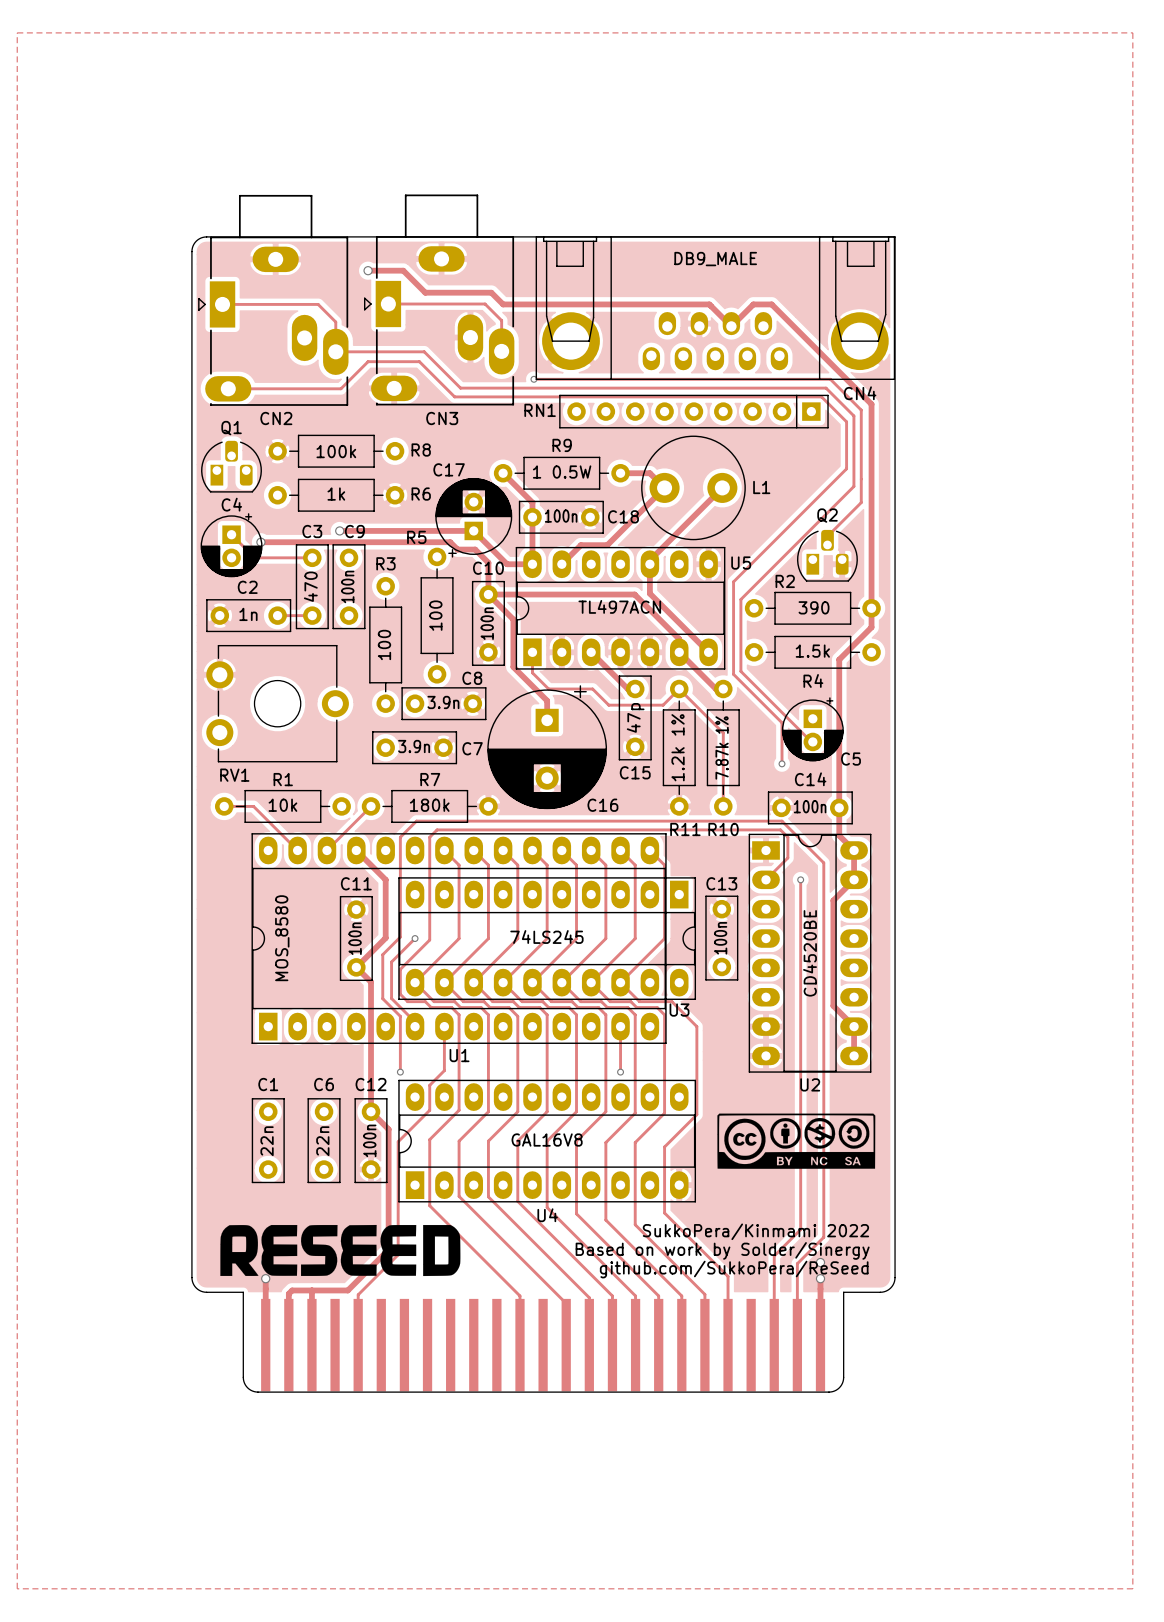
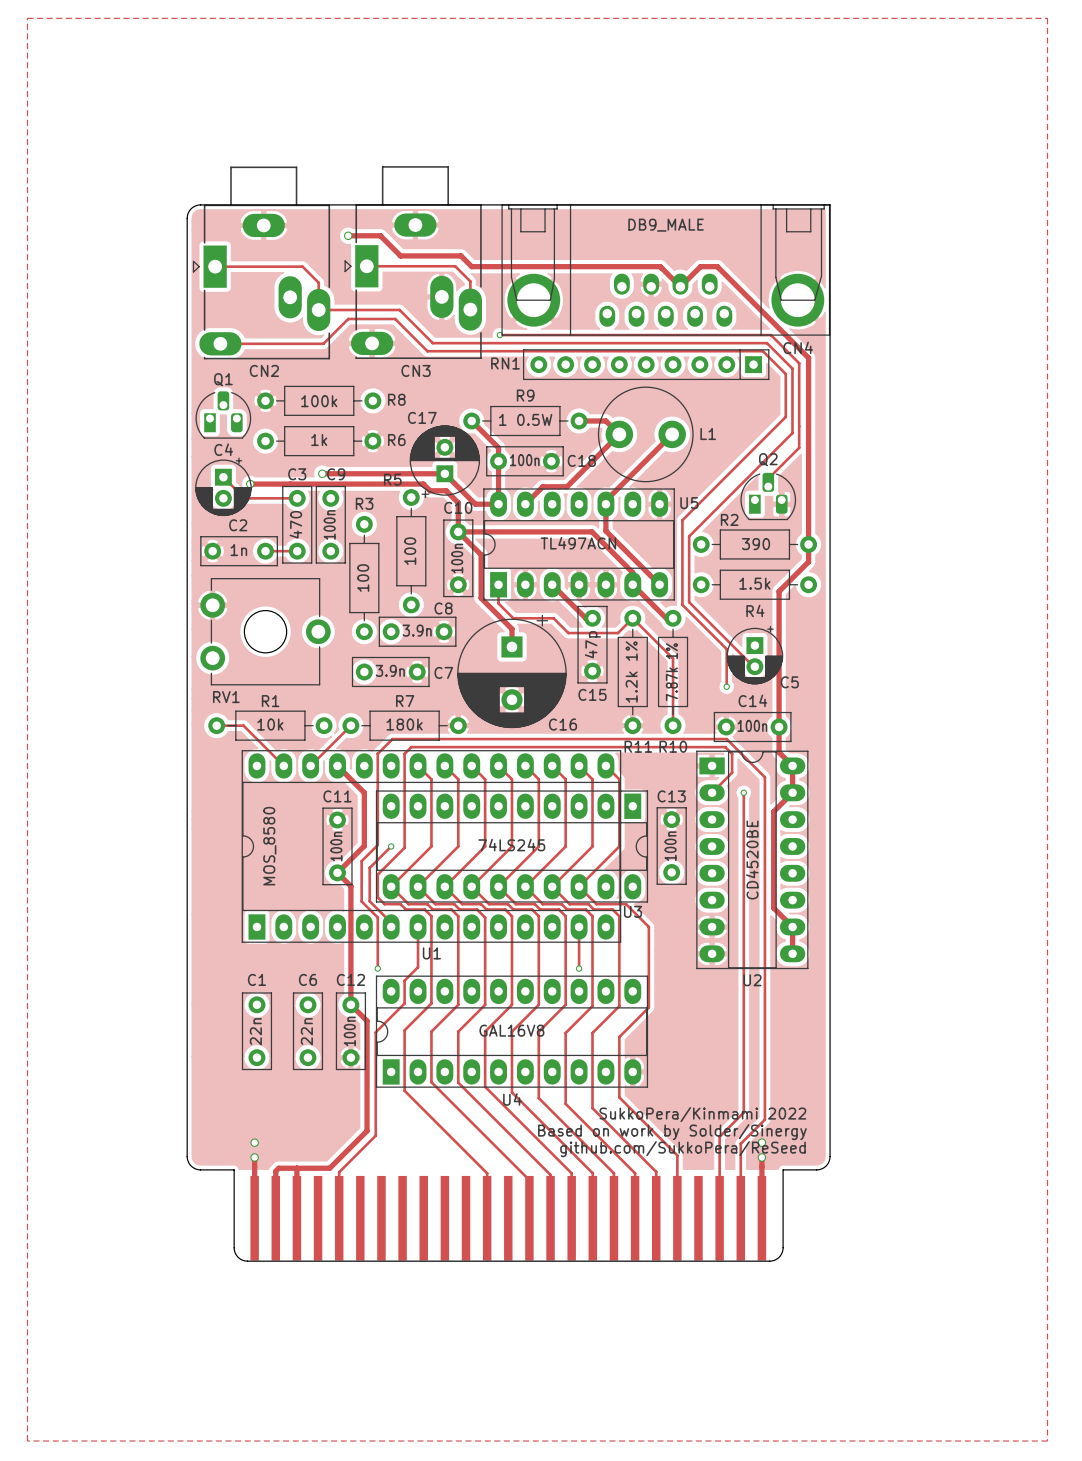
drawing: [717, 1113, 876, 1169] -> none
drawing: [220, 1224, 461, 1277] -> none

